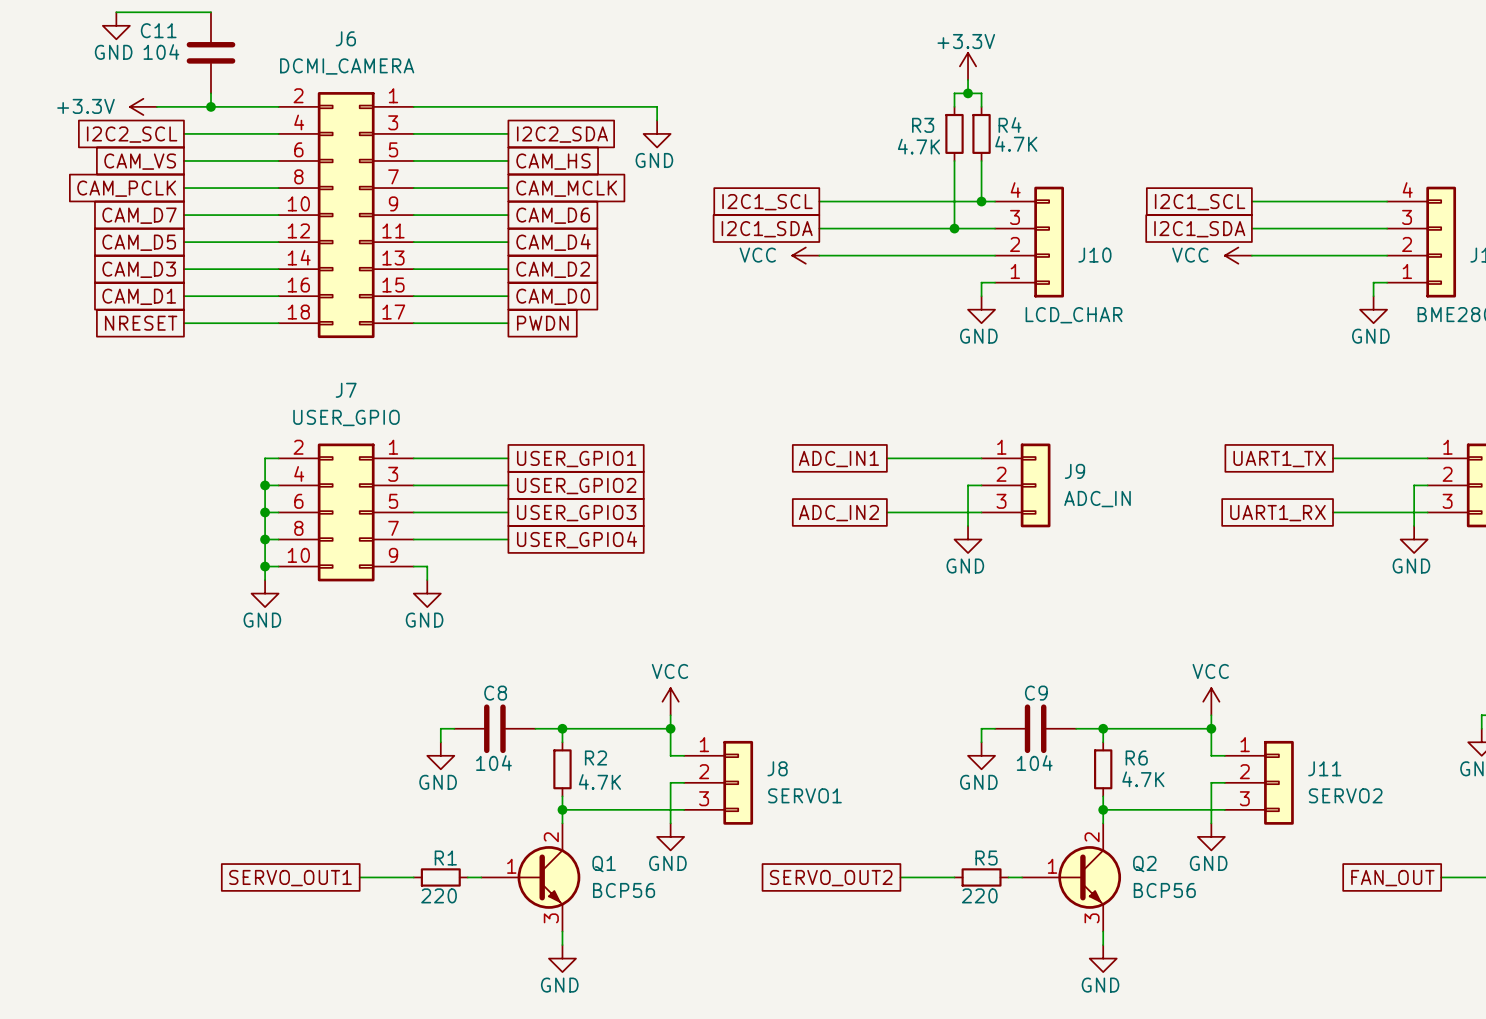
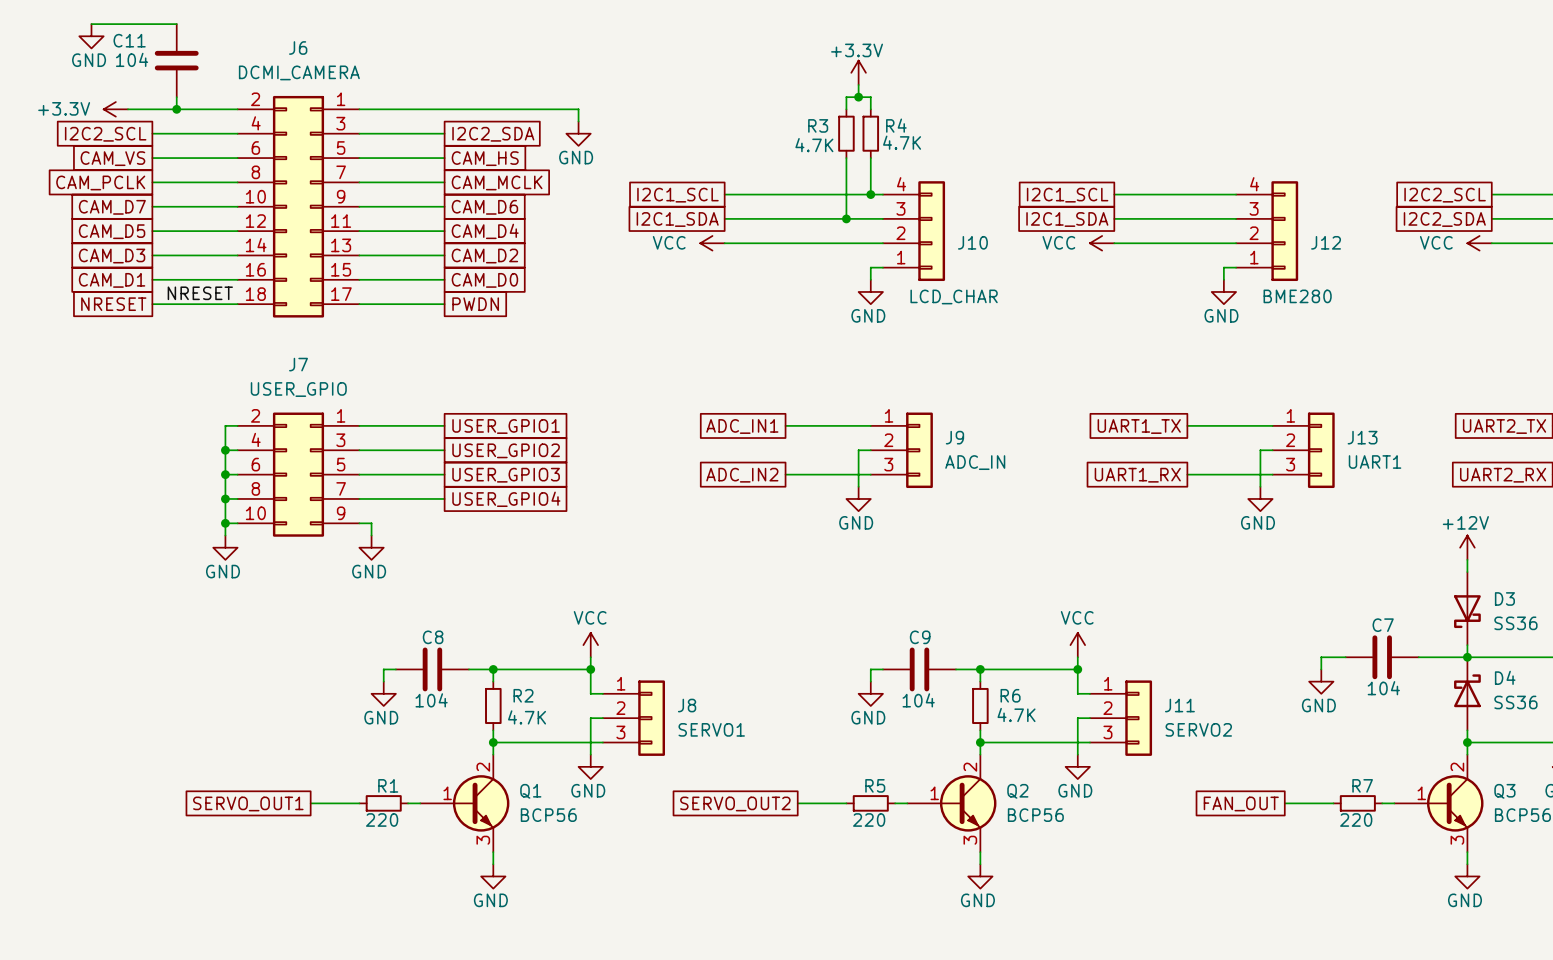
label: none -> NRESET (200, 293)

